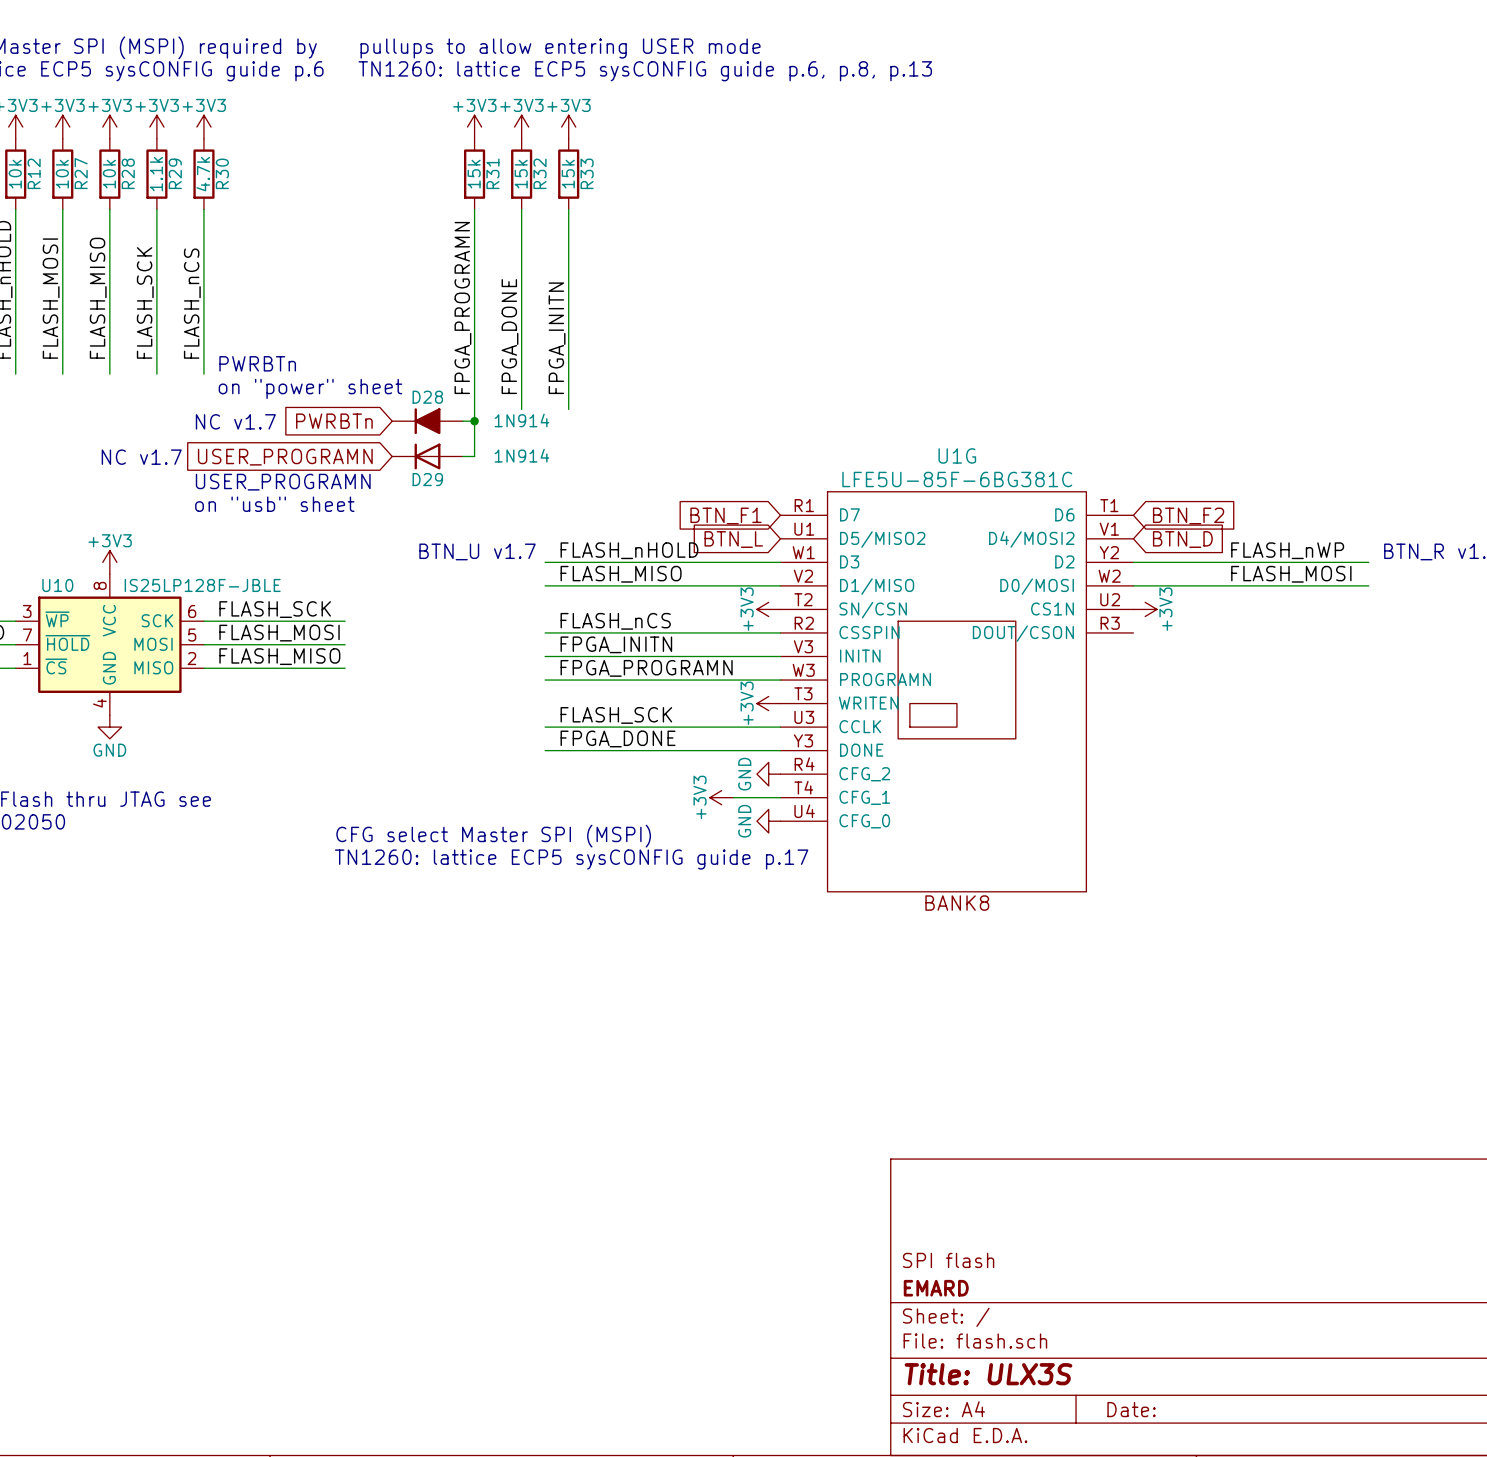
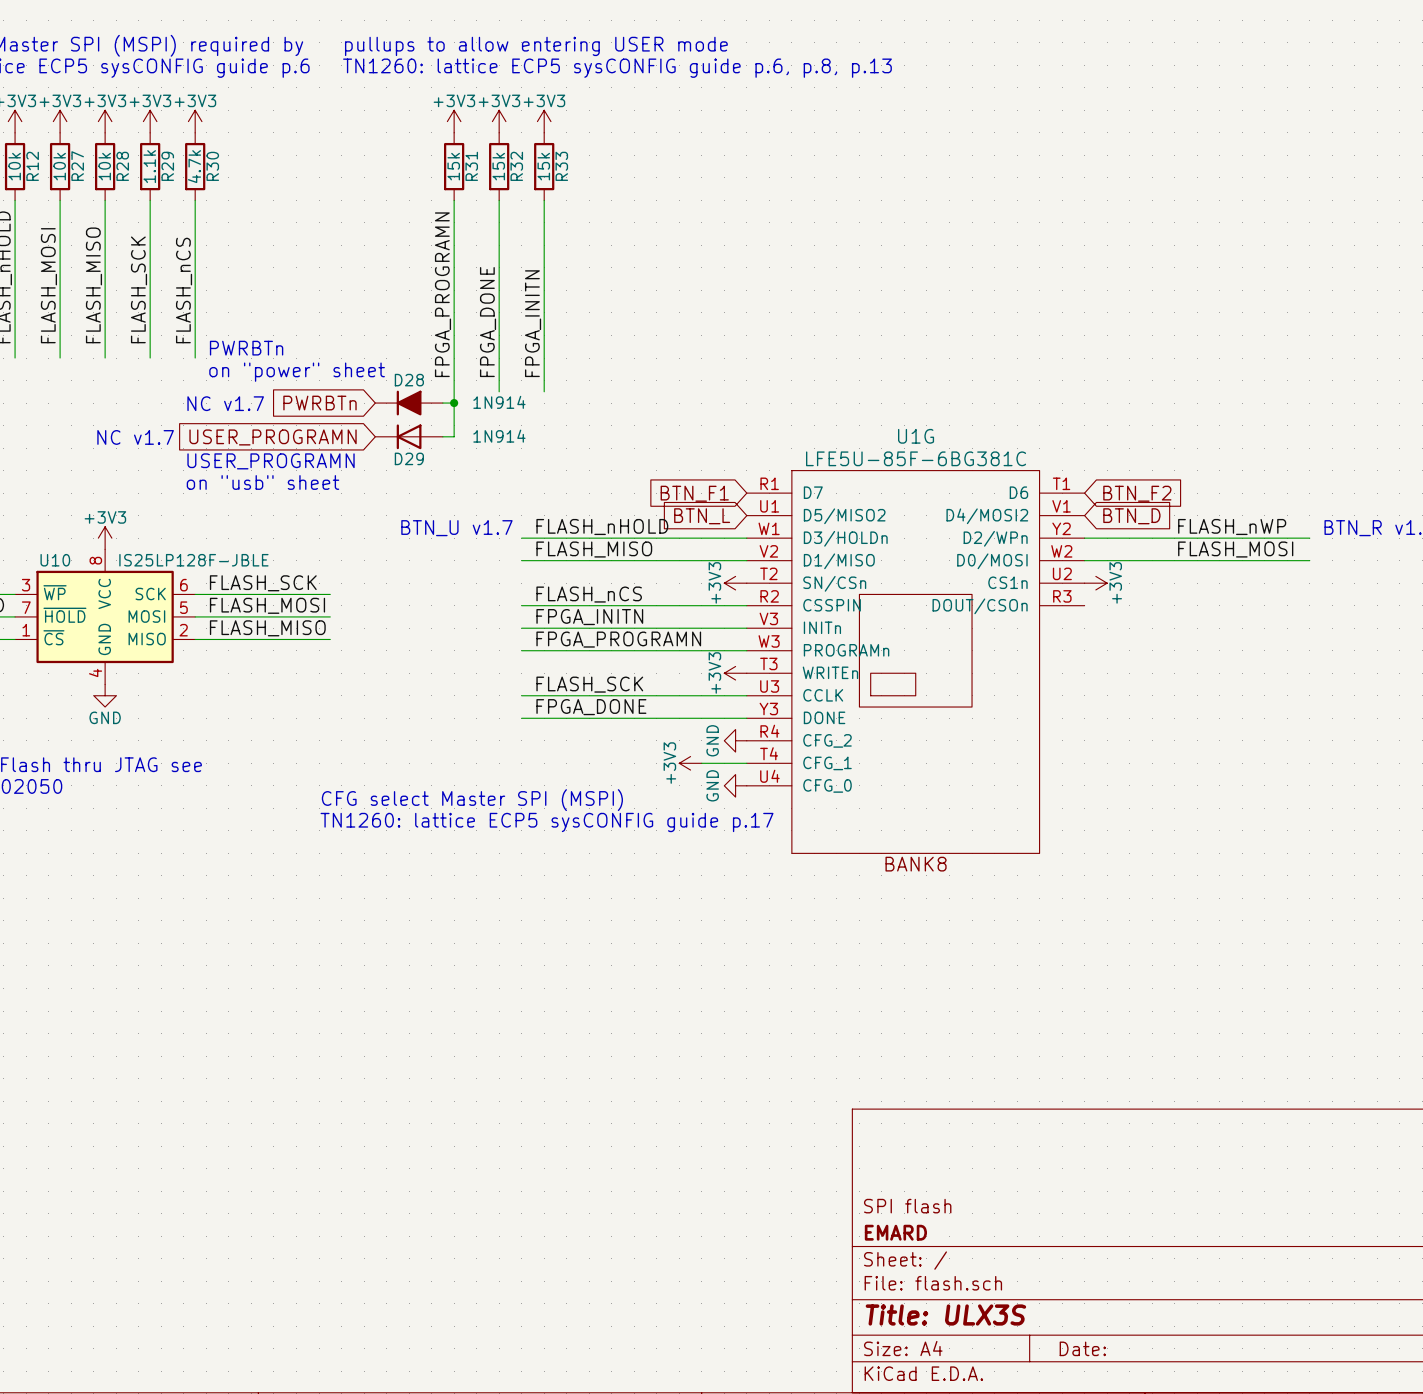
U1G pin name: D3 (849, 561) -> D3/HOLDn (845, 538)
U1G pin name: D2 (1064, 561) -> D2/WPn (995, 538)
U1G pin name: CS1N (1052, 608) -> CS1n (1007, 582)
U1G pin name: SN/CSN (873, 610) -> SN/CSn (834, 583)
U1G pin name: DOUT/CSON (1023, 633) -> DOUT/CSOn (980, 606)
U1G pin name: INITN (860, 656) -> INITn (822, 627)
U1G pin name: PROGRAMN (885, 679) -> PROGRAMn (846, 650)
U1G pin name: WRITEN (868, 703) -> WRITEn (830, 672)

